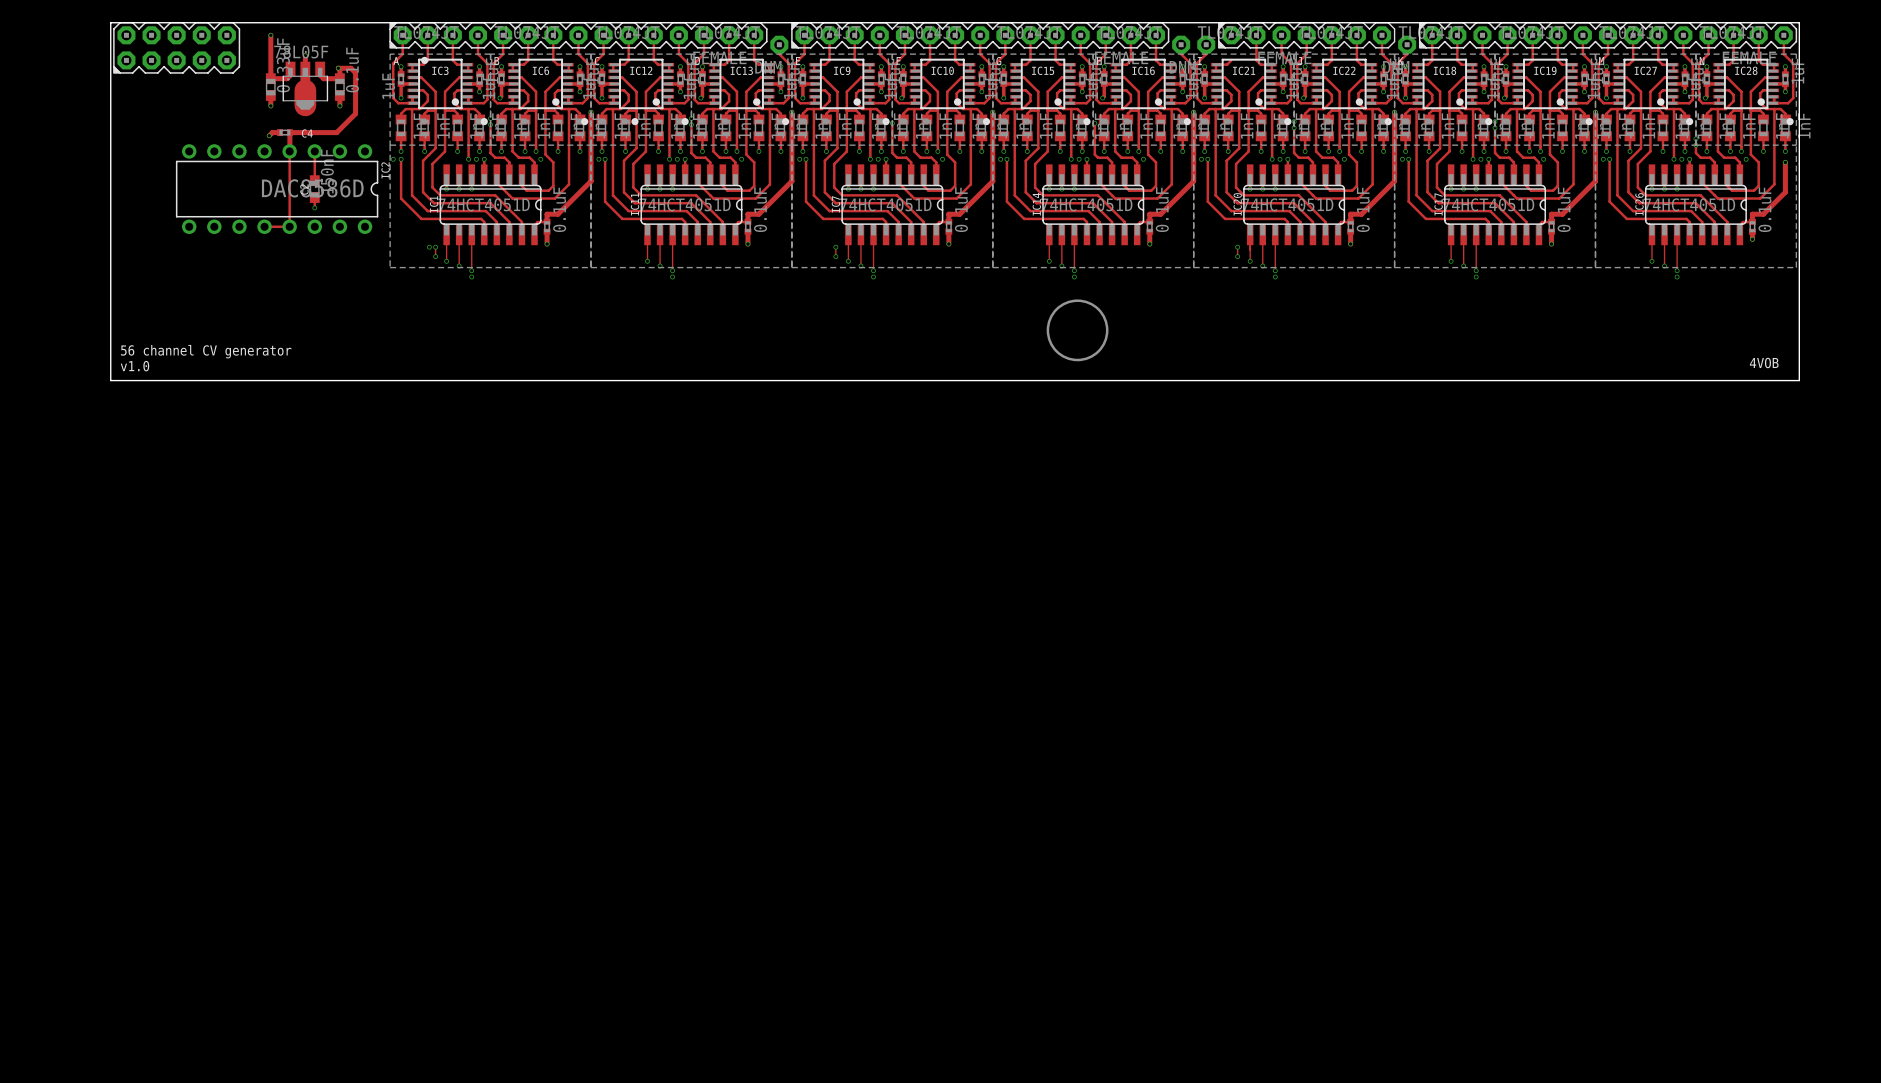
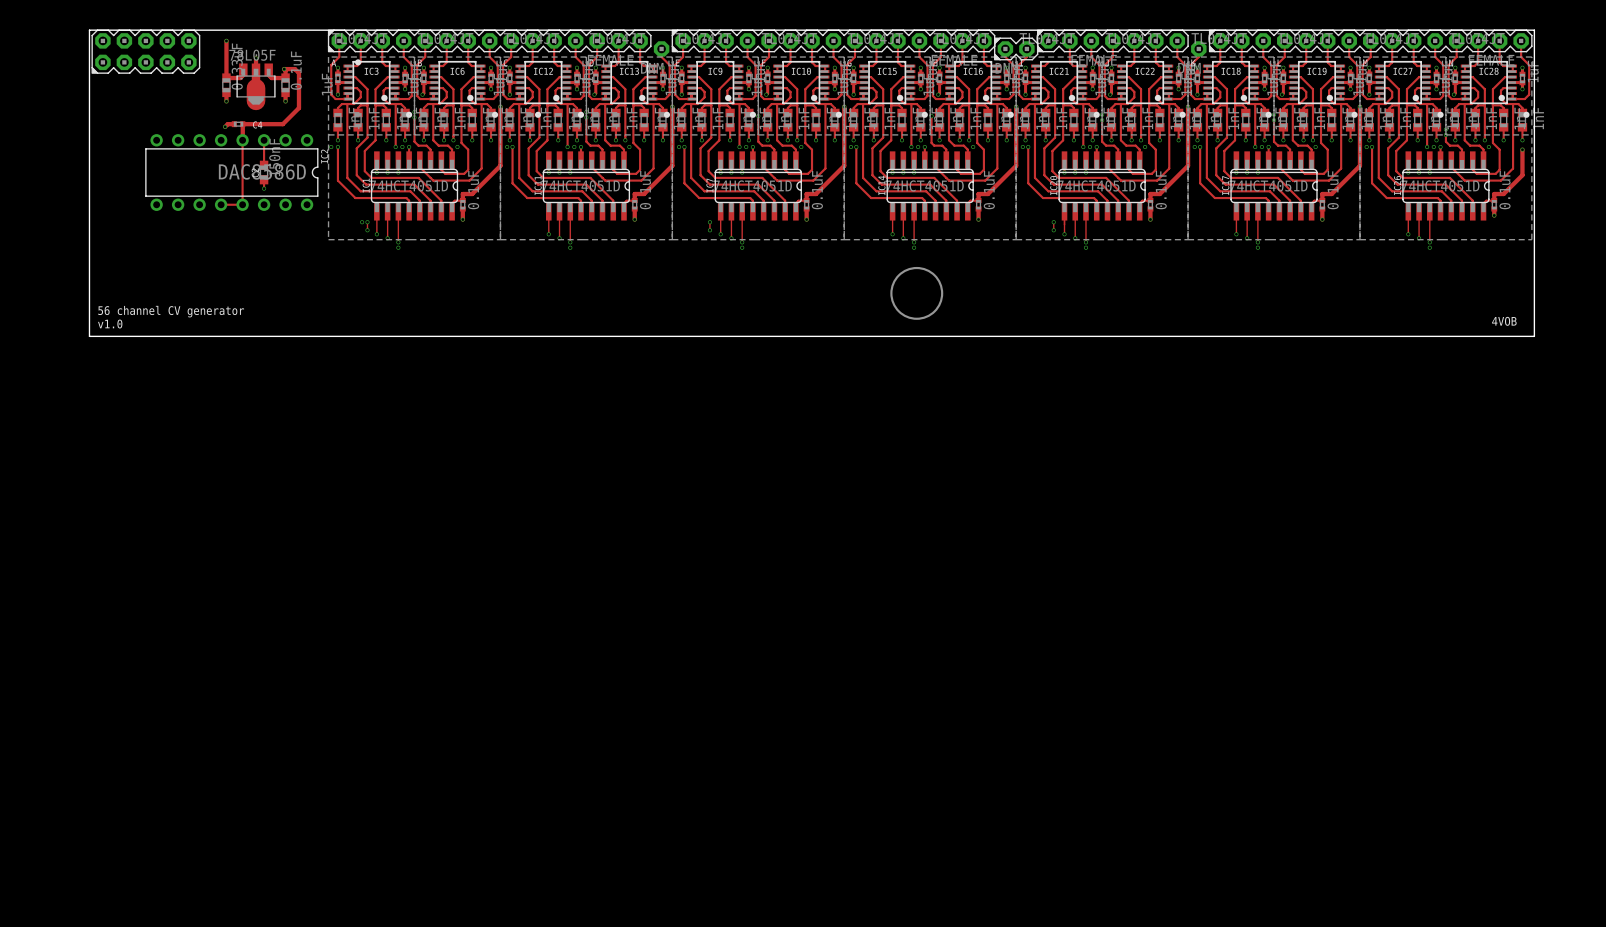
part footprint: [1172, 35, 1216, 54] -> [994, 37, 1039, 61]

